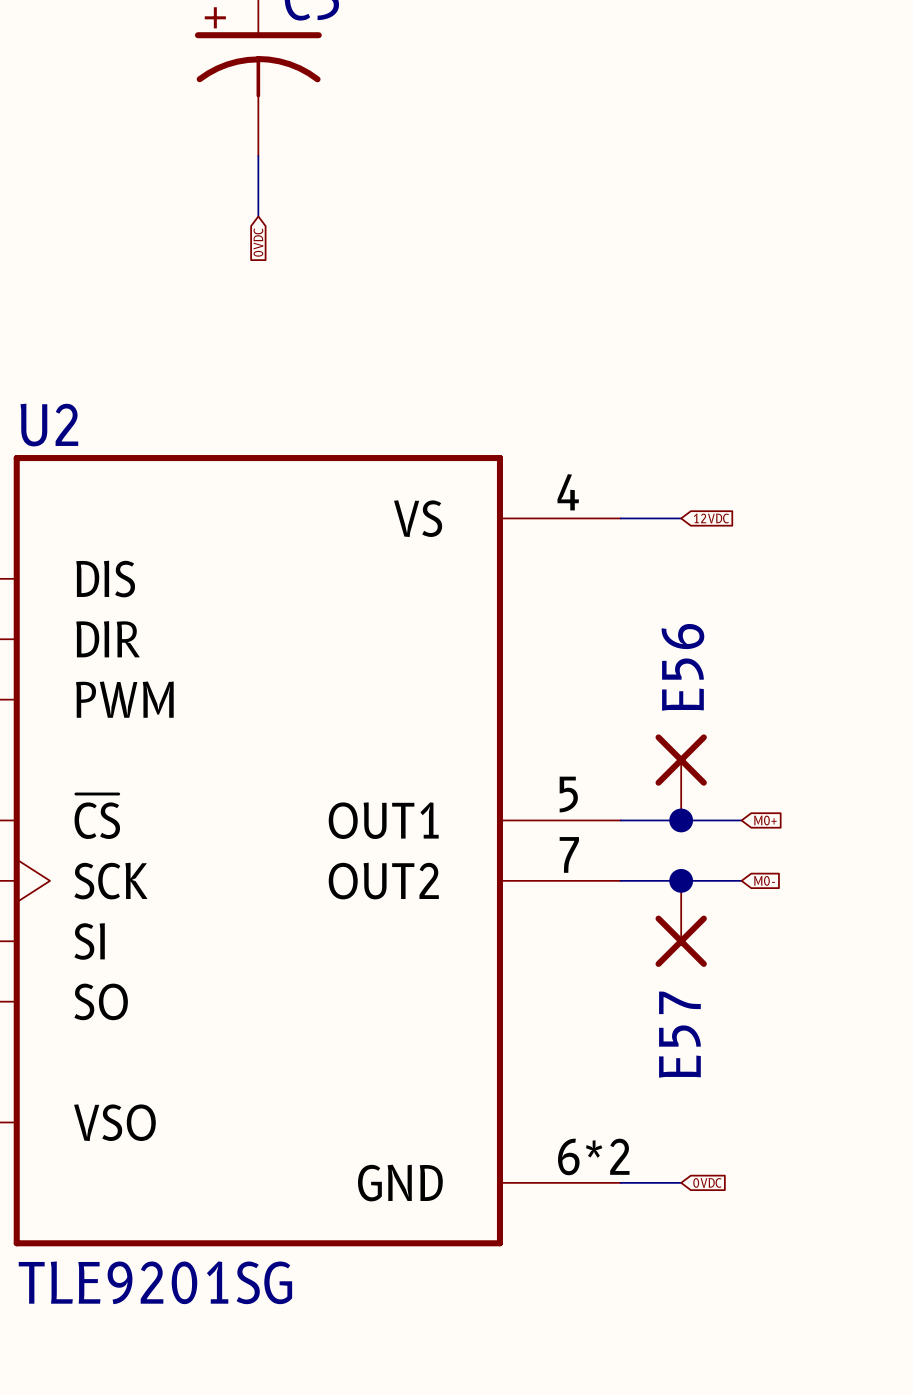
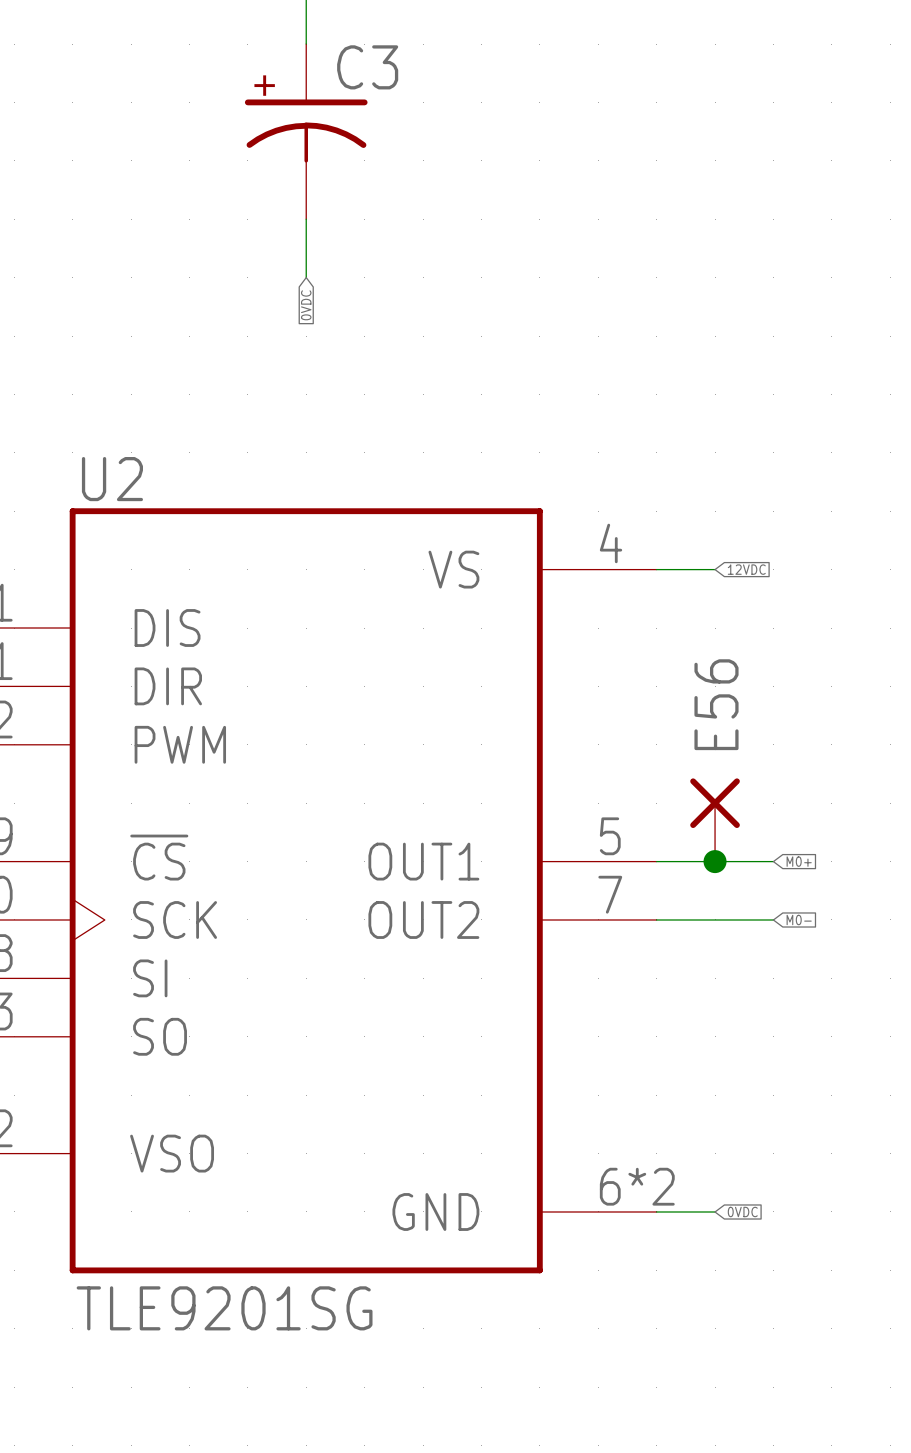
junction: (681, 880) -> none
E57: (681, 923) -> none

